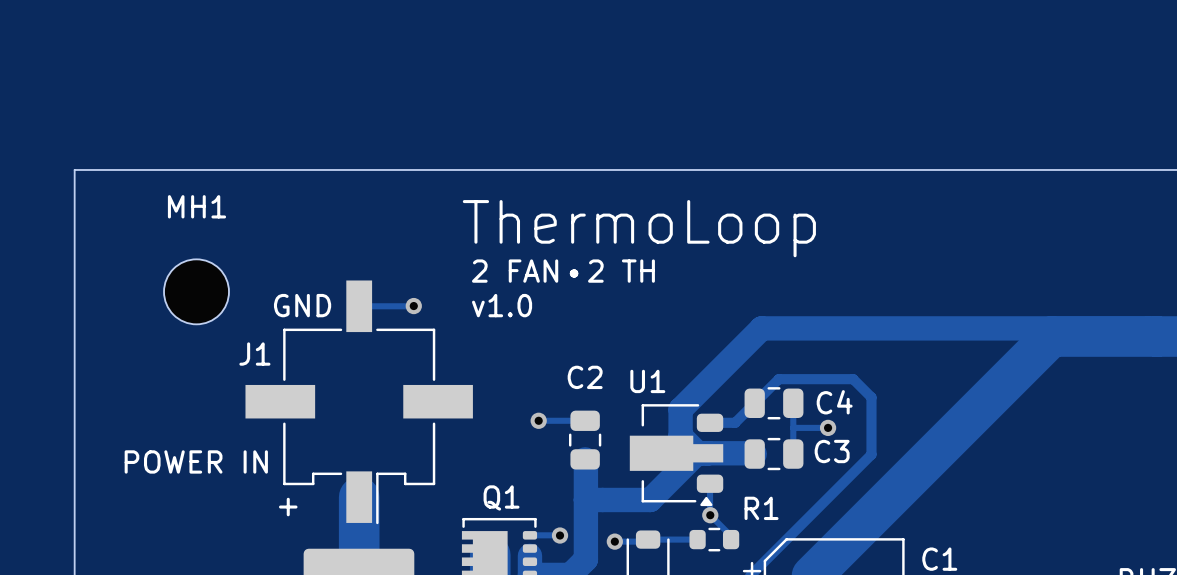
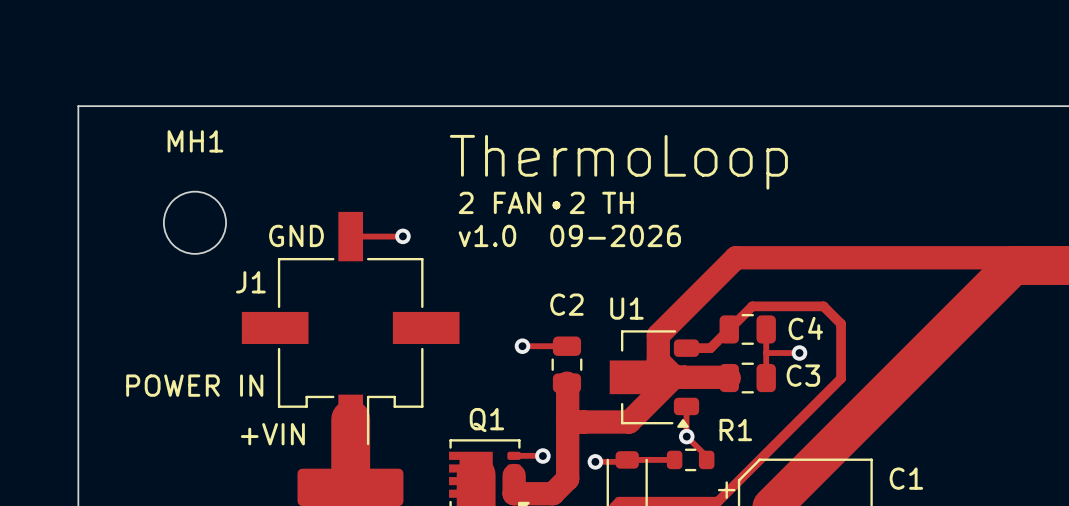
text: v1.0 (502, 305) -> v1.0 09-2026 (569, 235)
text: + (288, 507) -> none
text: none -> +VIN (272, 434)

